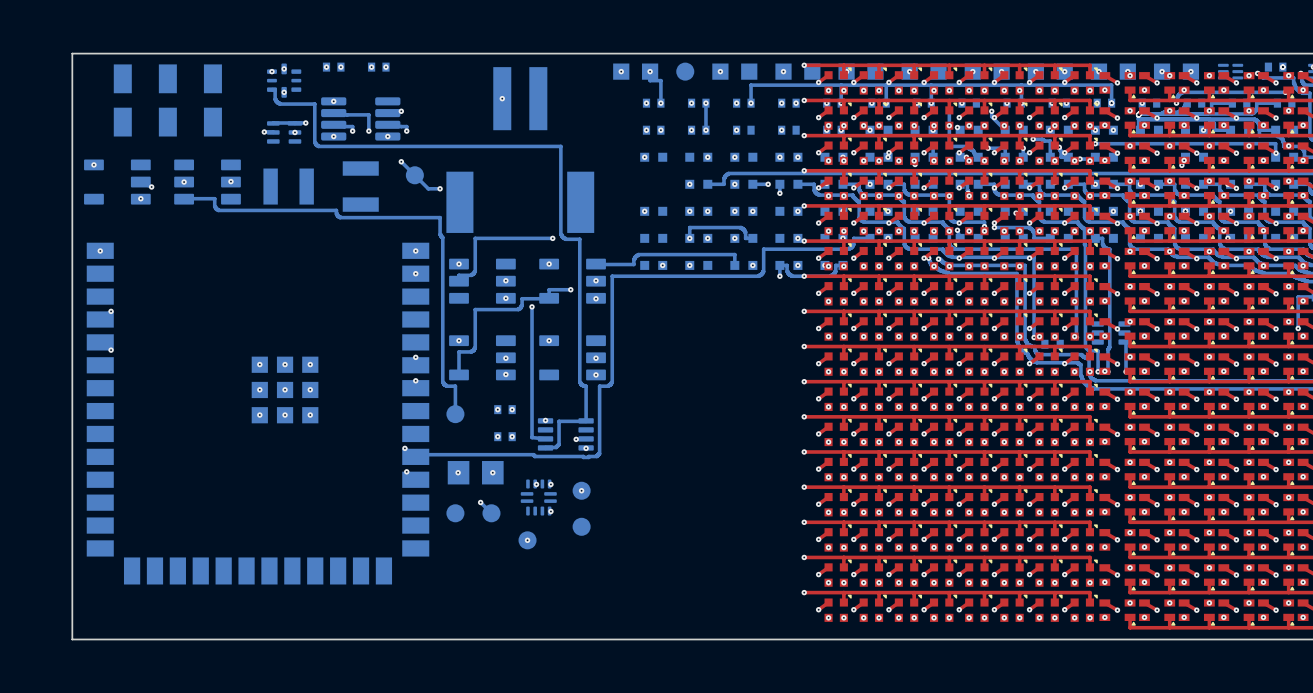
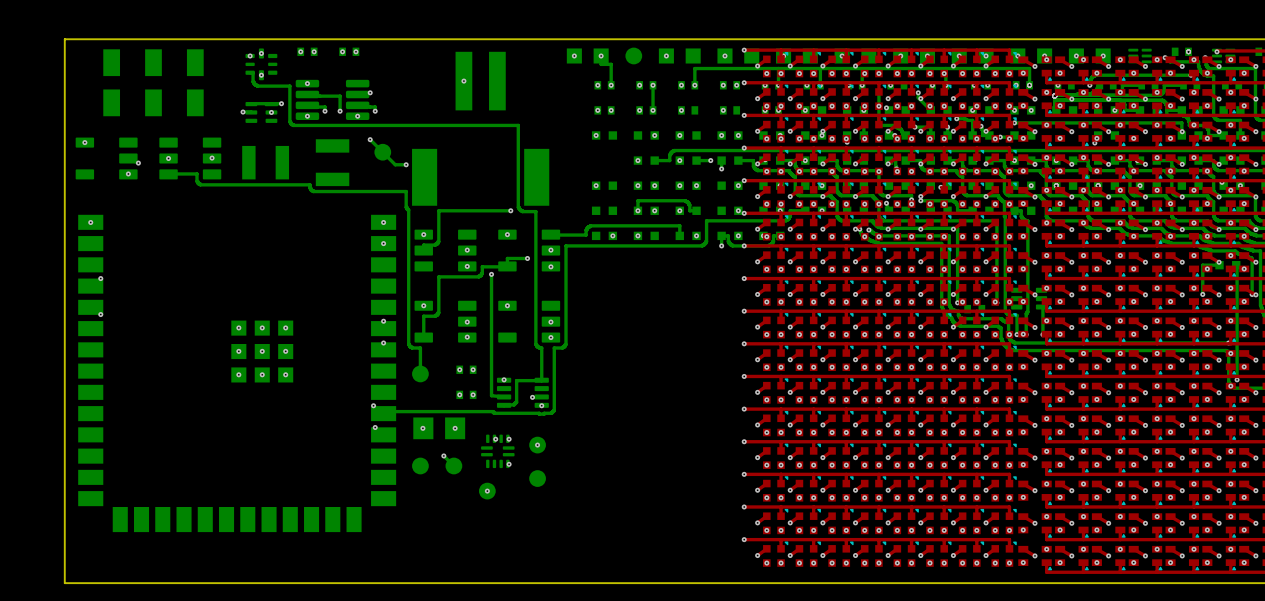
via: (1227, 238) -> none

